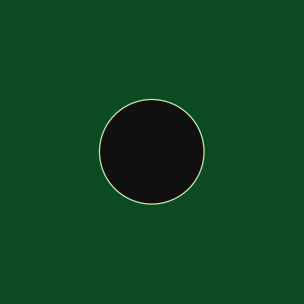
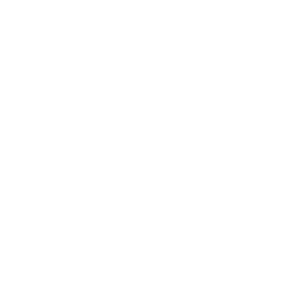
part: (151, 151) -> none

